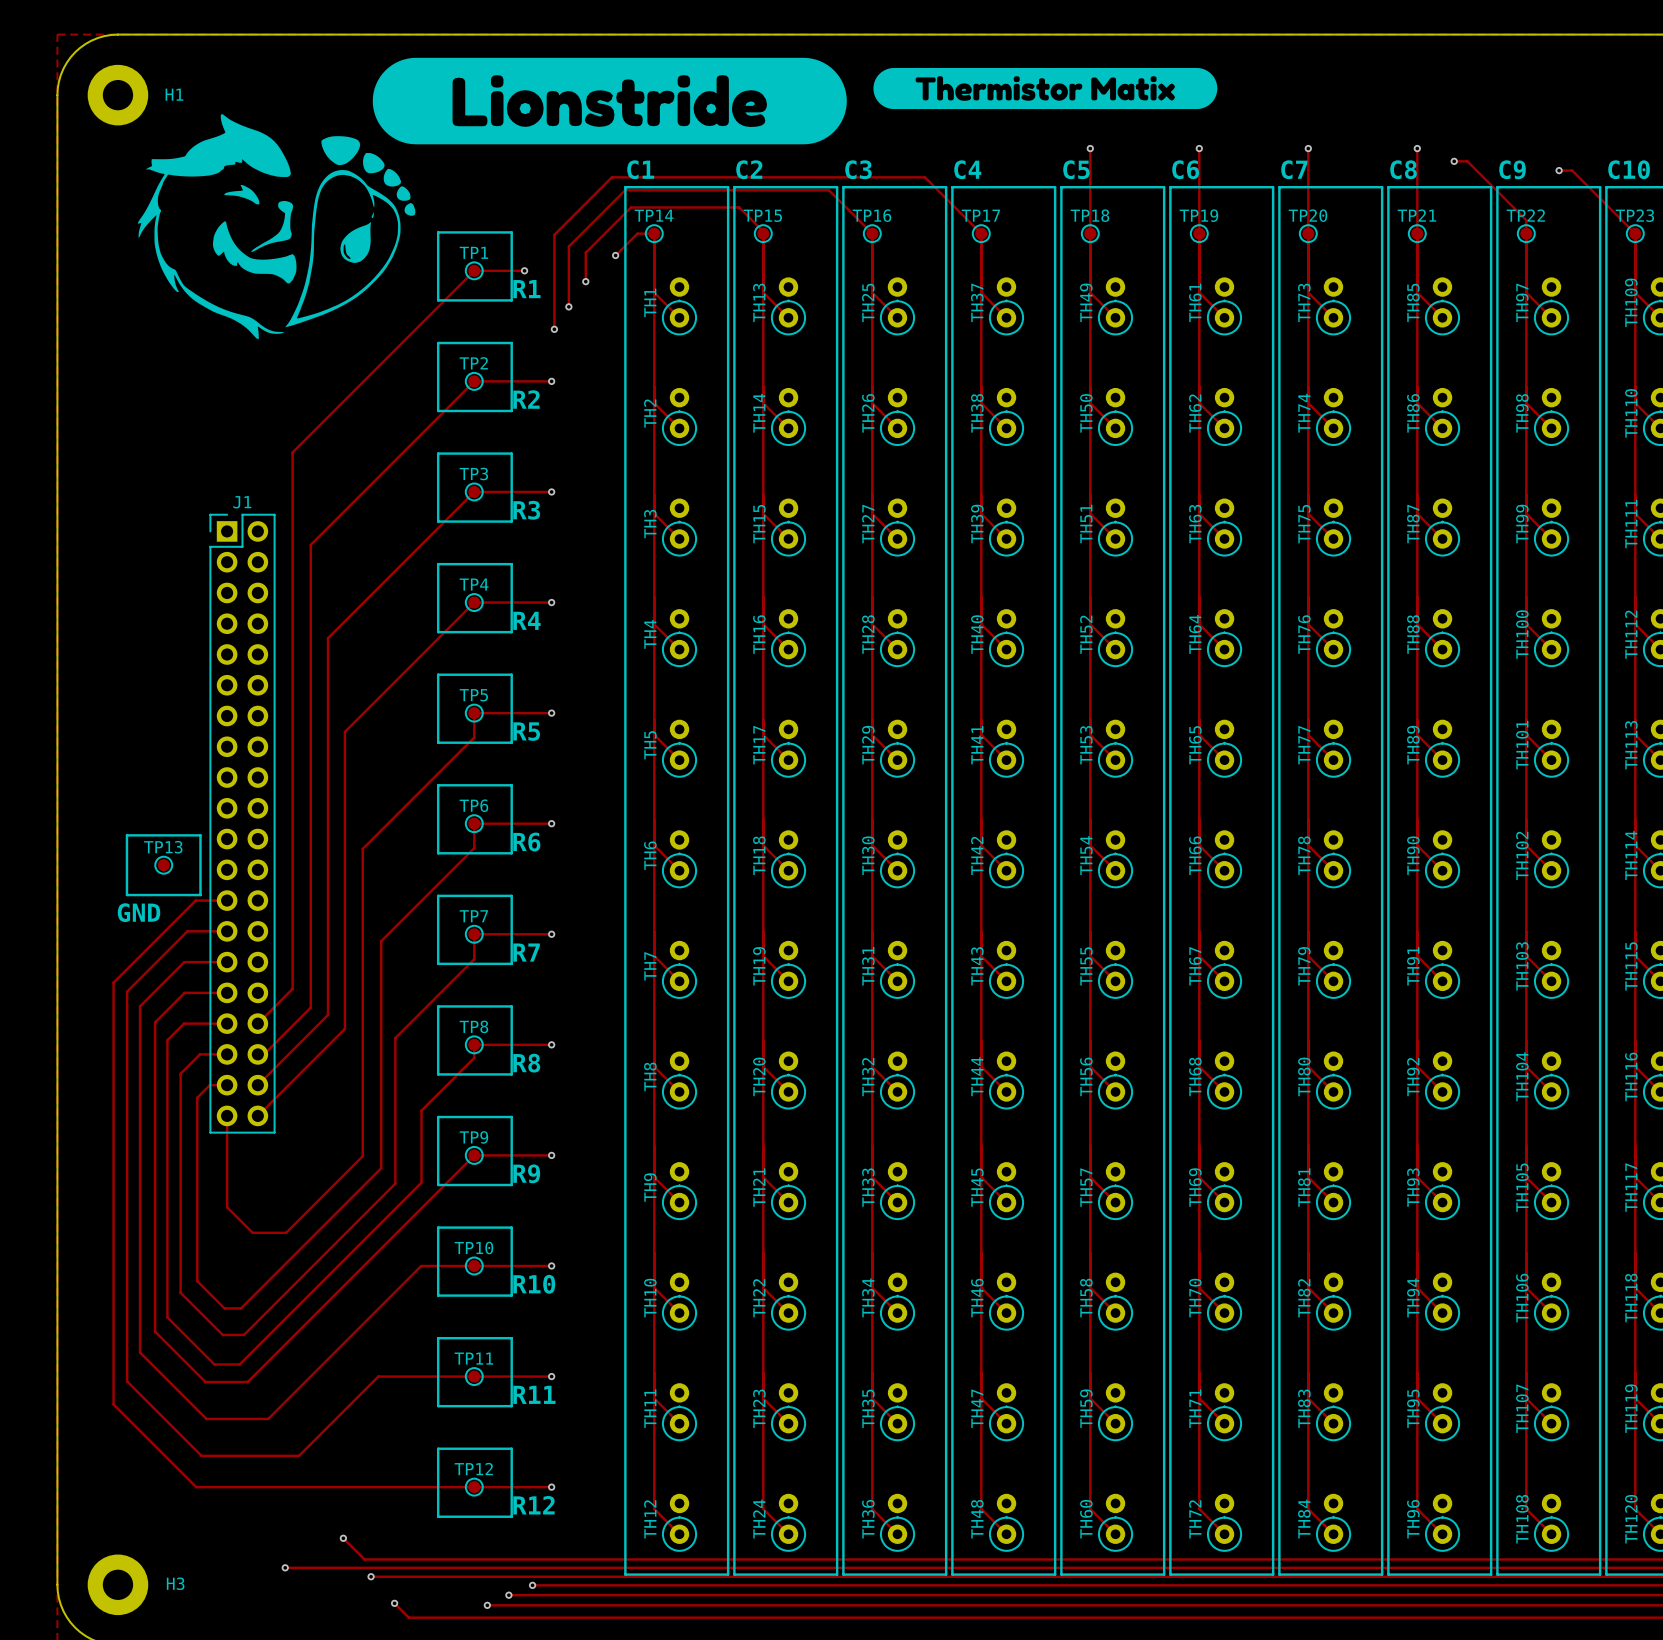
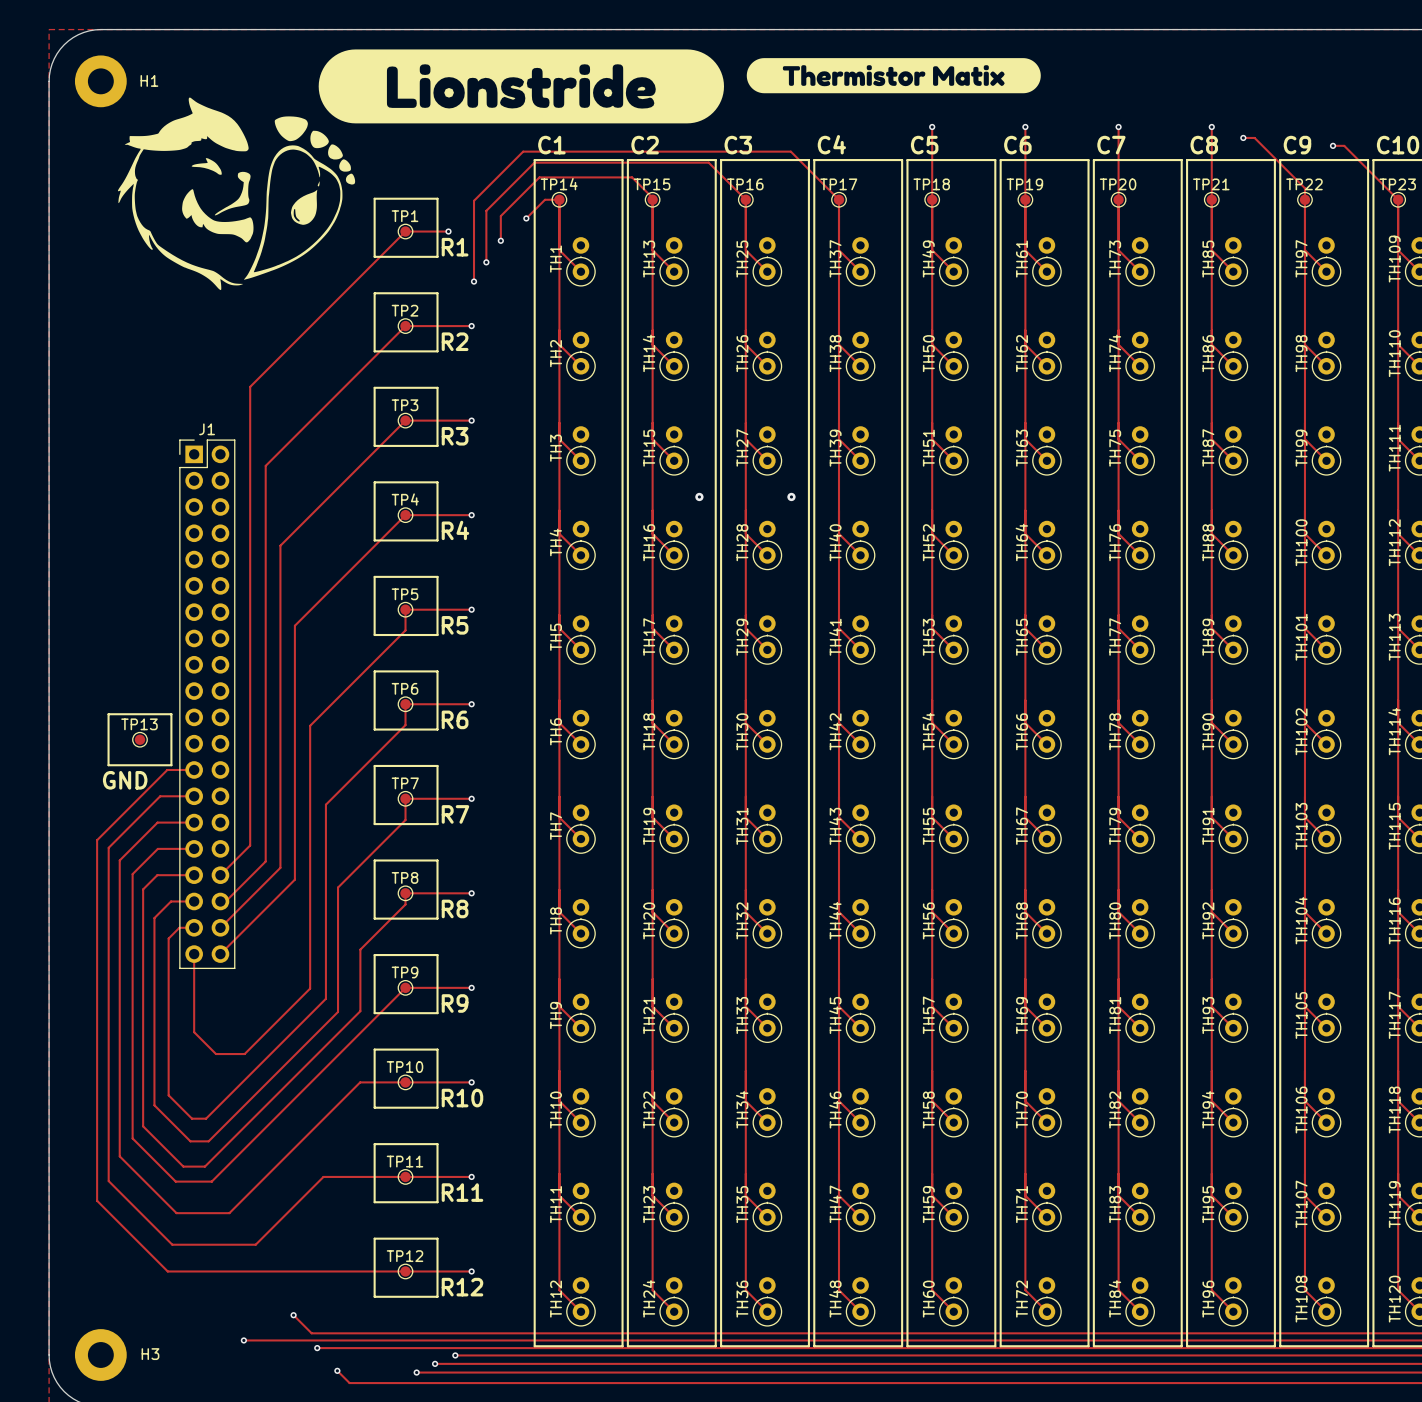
via: none -> (699, 496)
via: none -> (791, 496)

